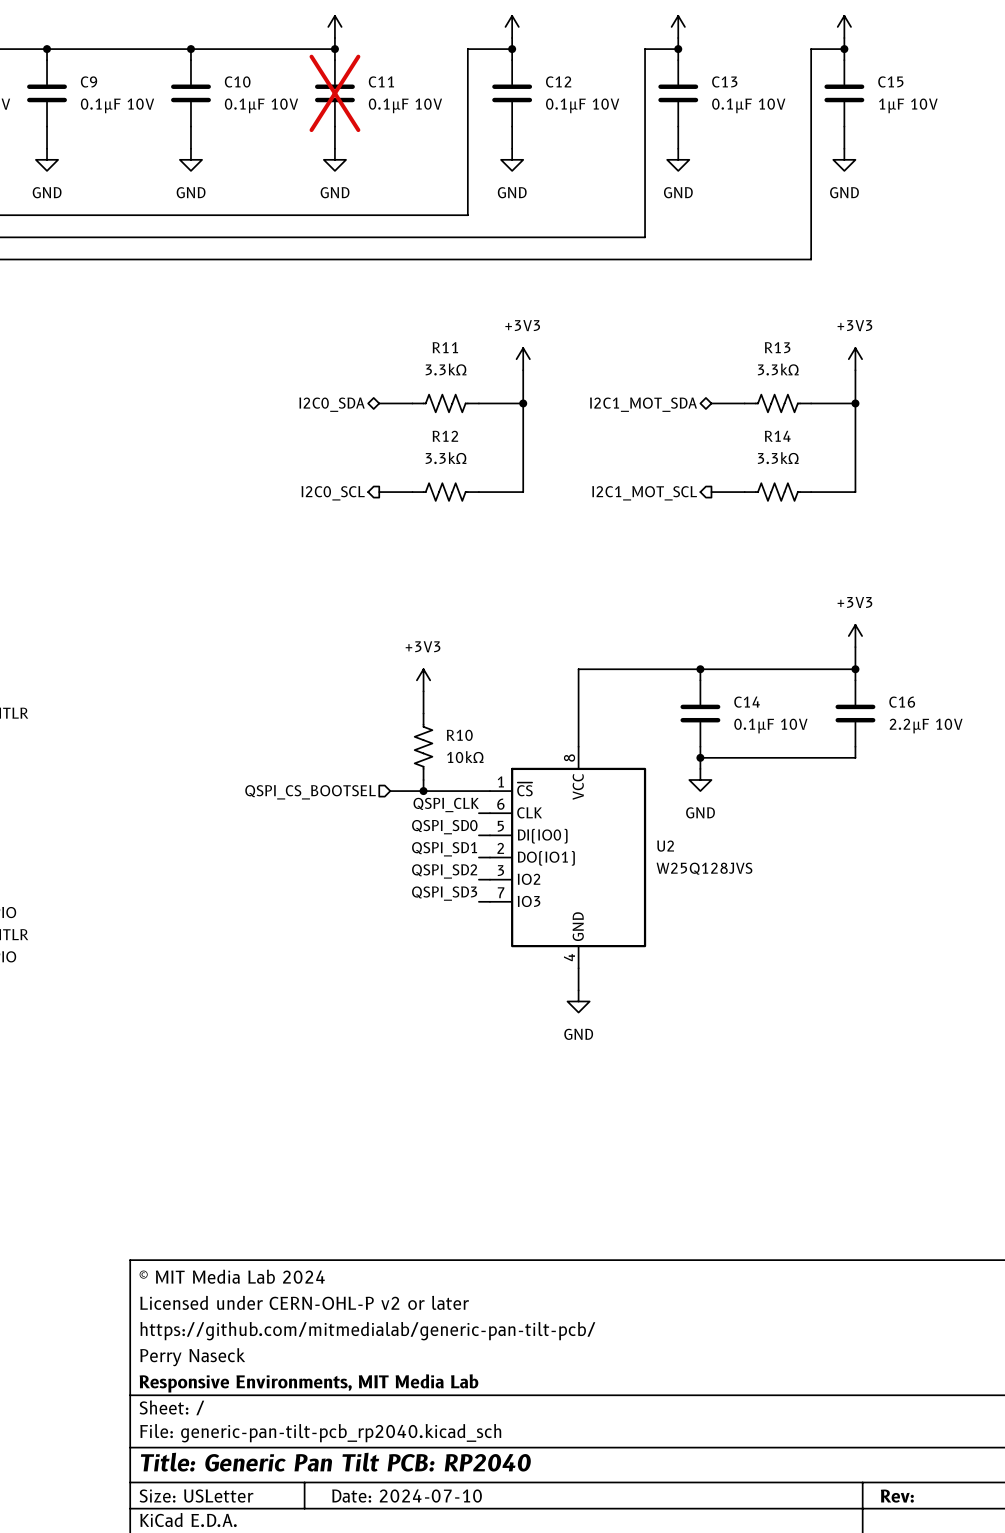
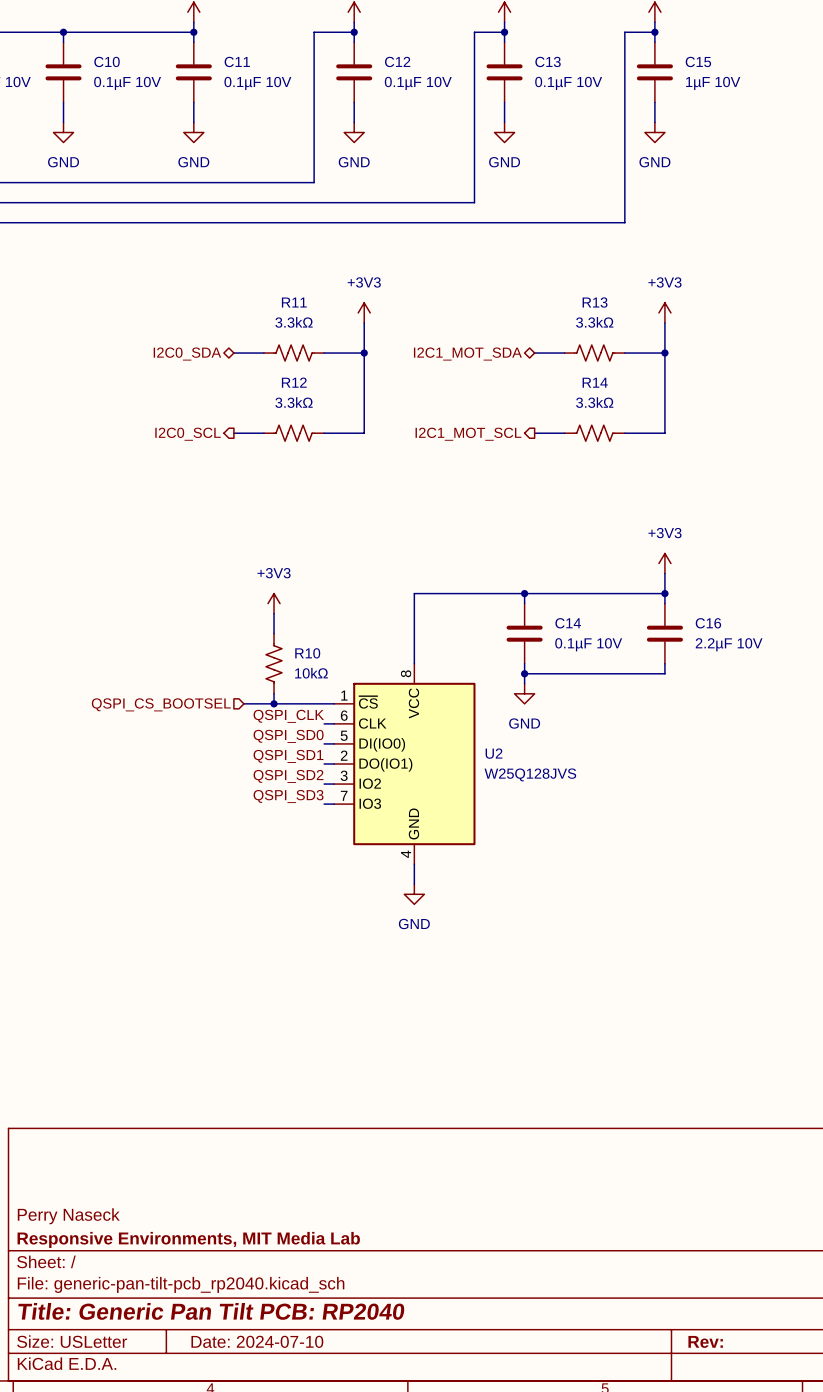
C11 do-not-place cross: (334, 93) -> none
title block: © MIT Media Lab 2024 (232, 1276) -> none
title block: Licensed under CERN-OHL-P v2 or later (304, 1302) -> none
title block: https://github.com/mitmedialab/generic-pan-tilt-pcb/ (367, 1331) -> none

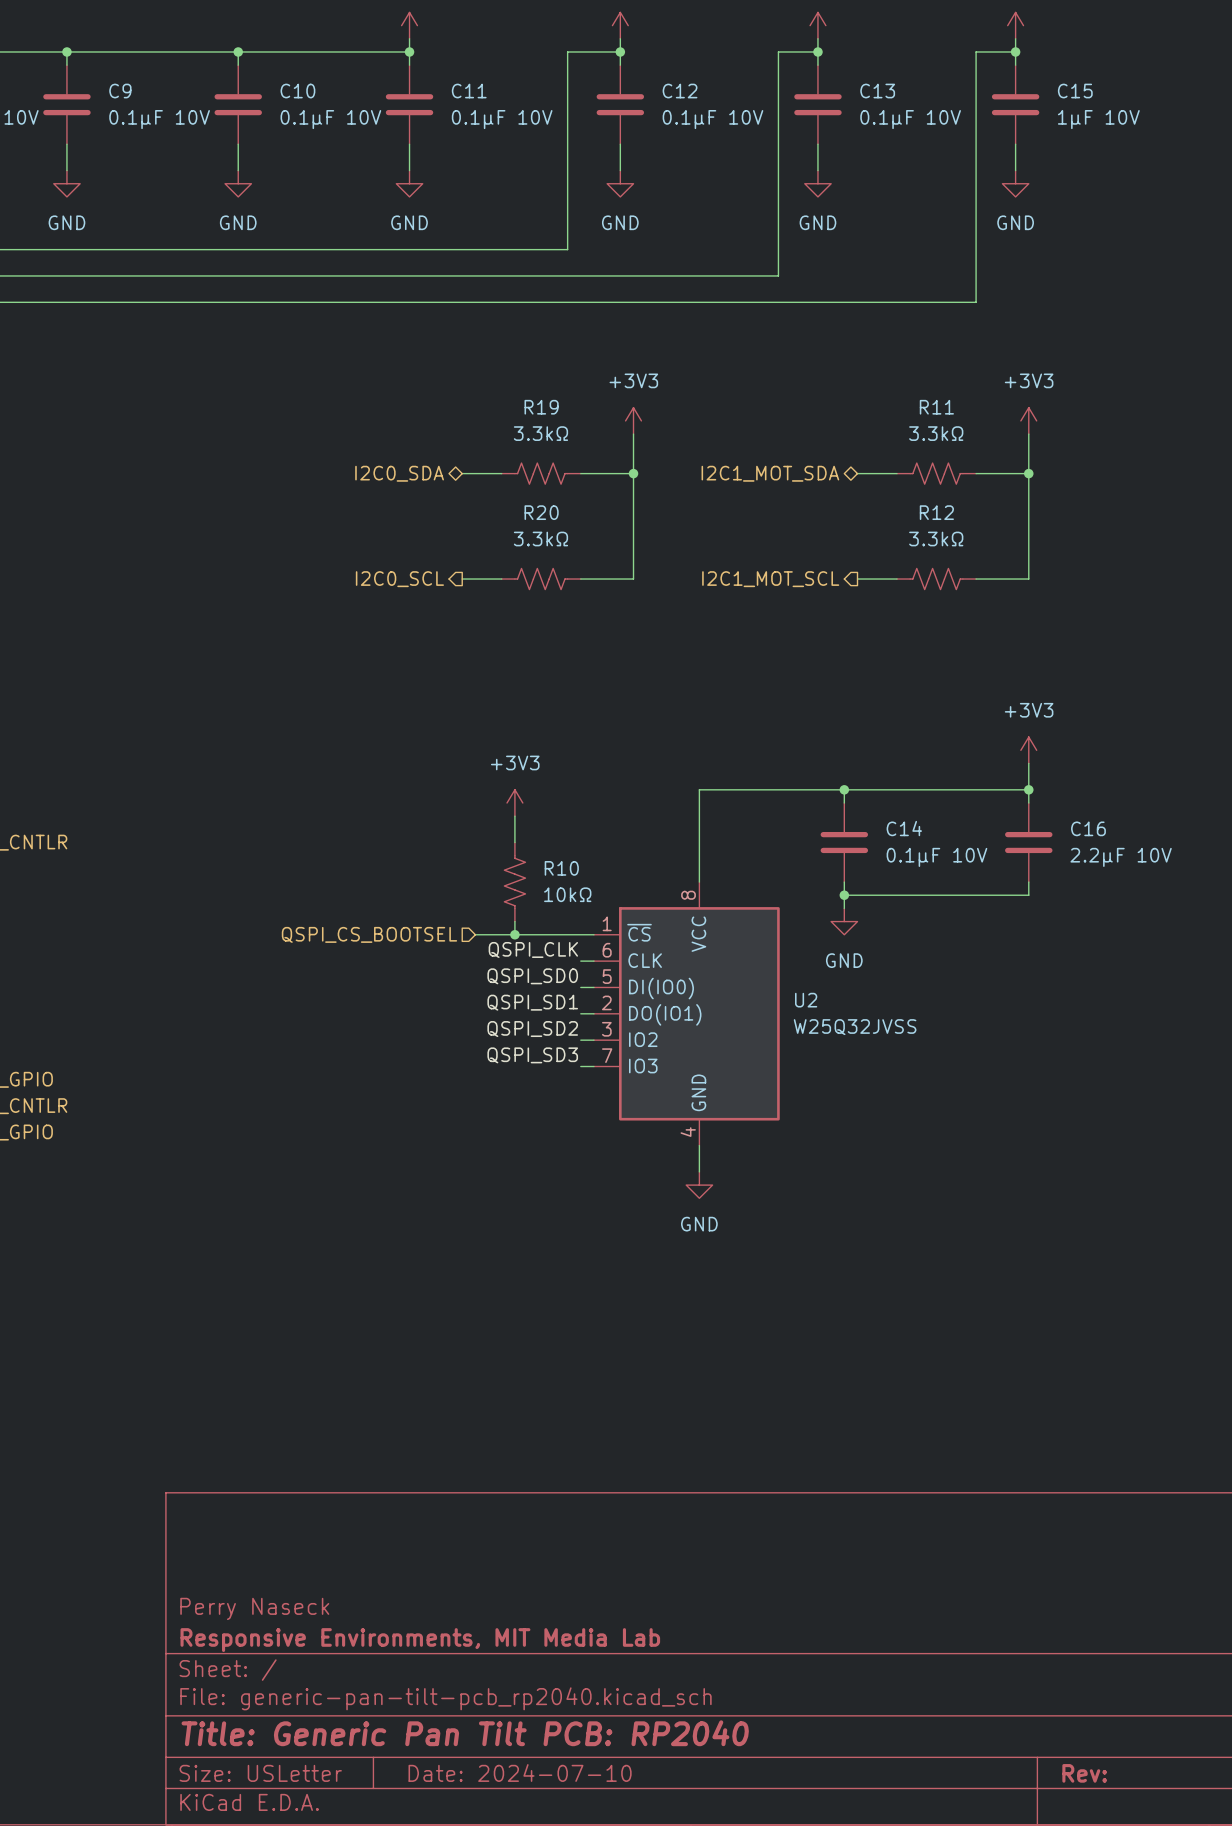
R11 name: R11 (294, 302) -> R19 (541, 407)
R13 name: R13 (595, 302) -> R11 (936, 407)
R12 name: R12 (294, 382) -> R20 (541, 512)
R14 name: R14 (595, 382) -> R12 (936, 512)
U2 value: W25Q128JVS (530, 774) -> W25Q32JVSS (855, 1027)

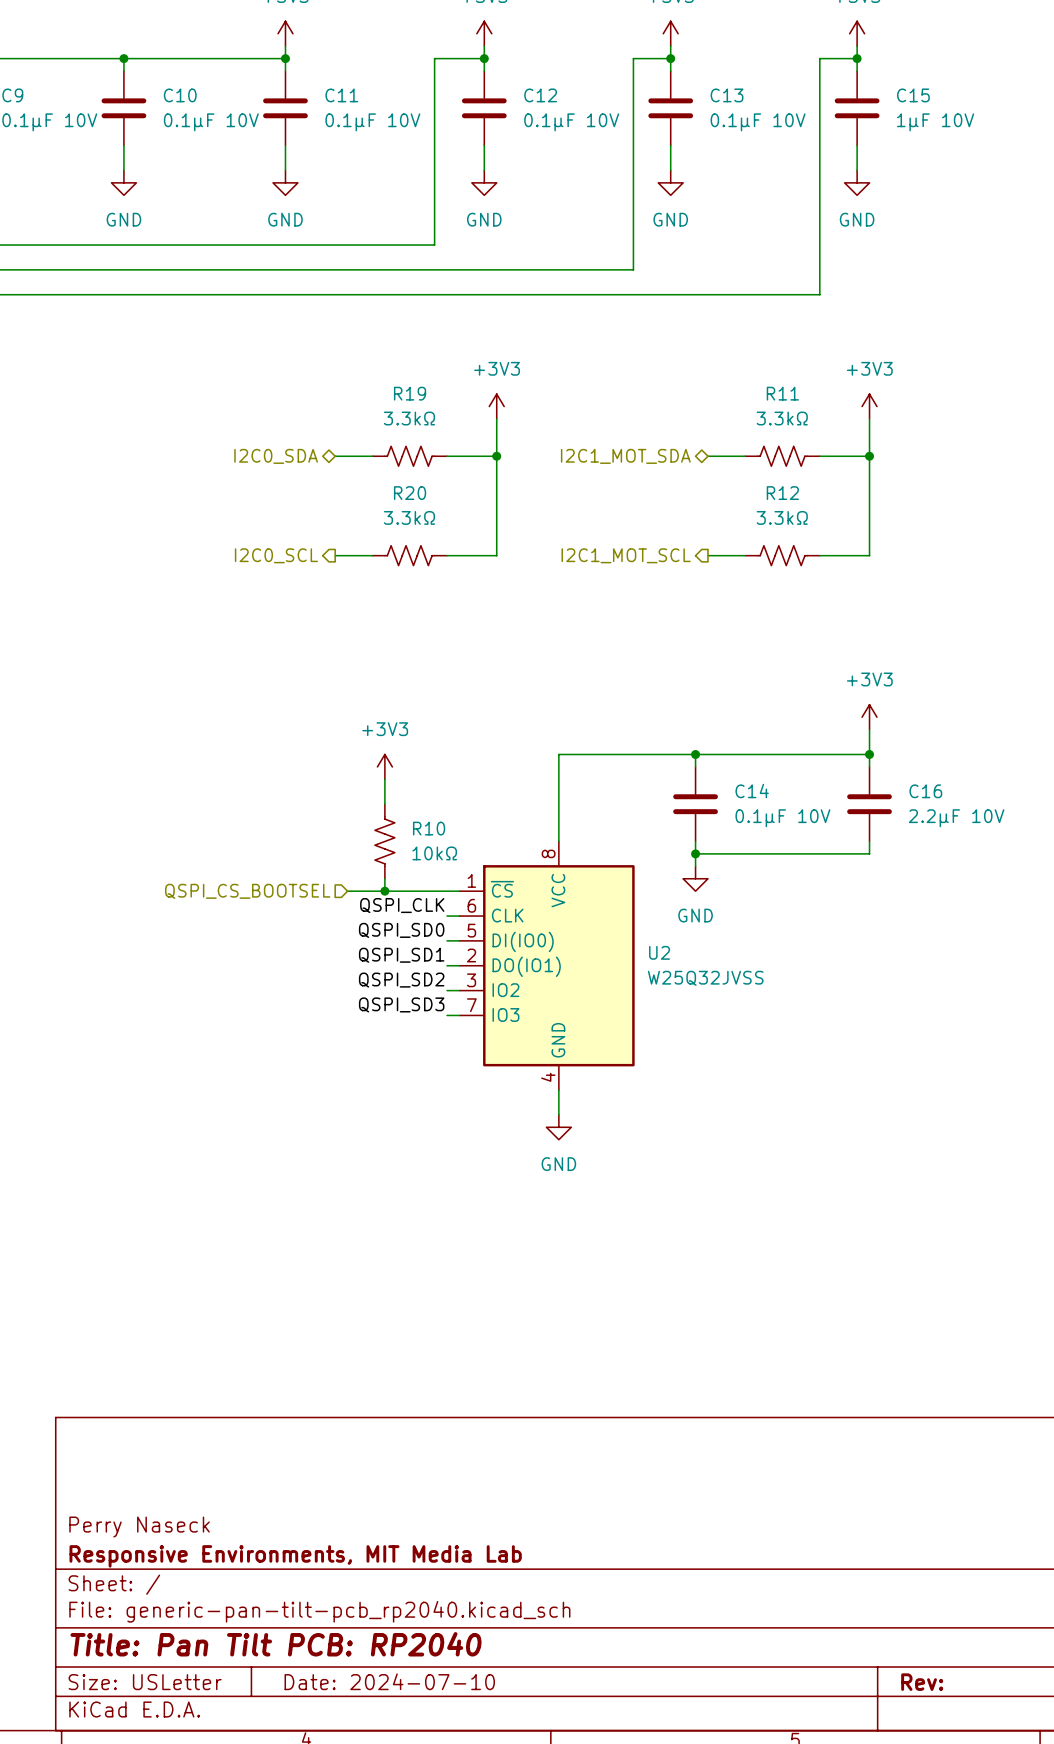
title block: Title: Generic Pan Tilt PCB: RP2040 (465, 1733) -> Title: Pan Tilt PCB: RP2040 (276, 1644)

